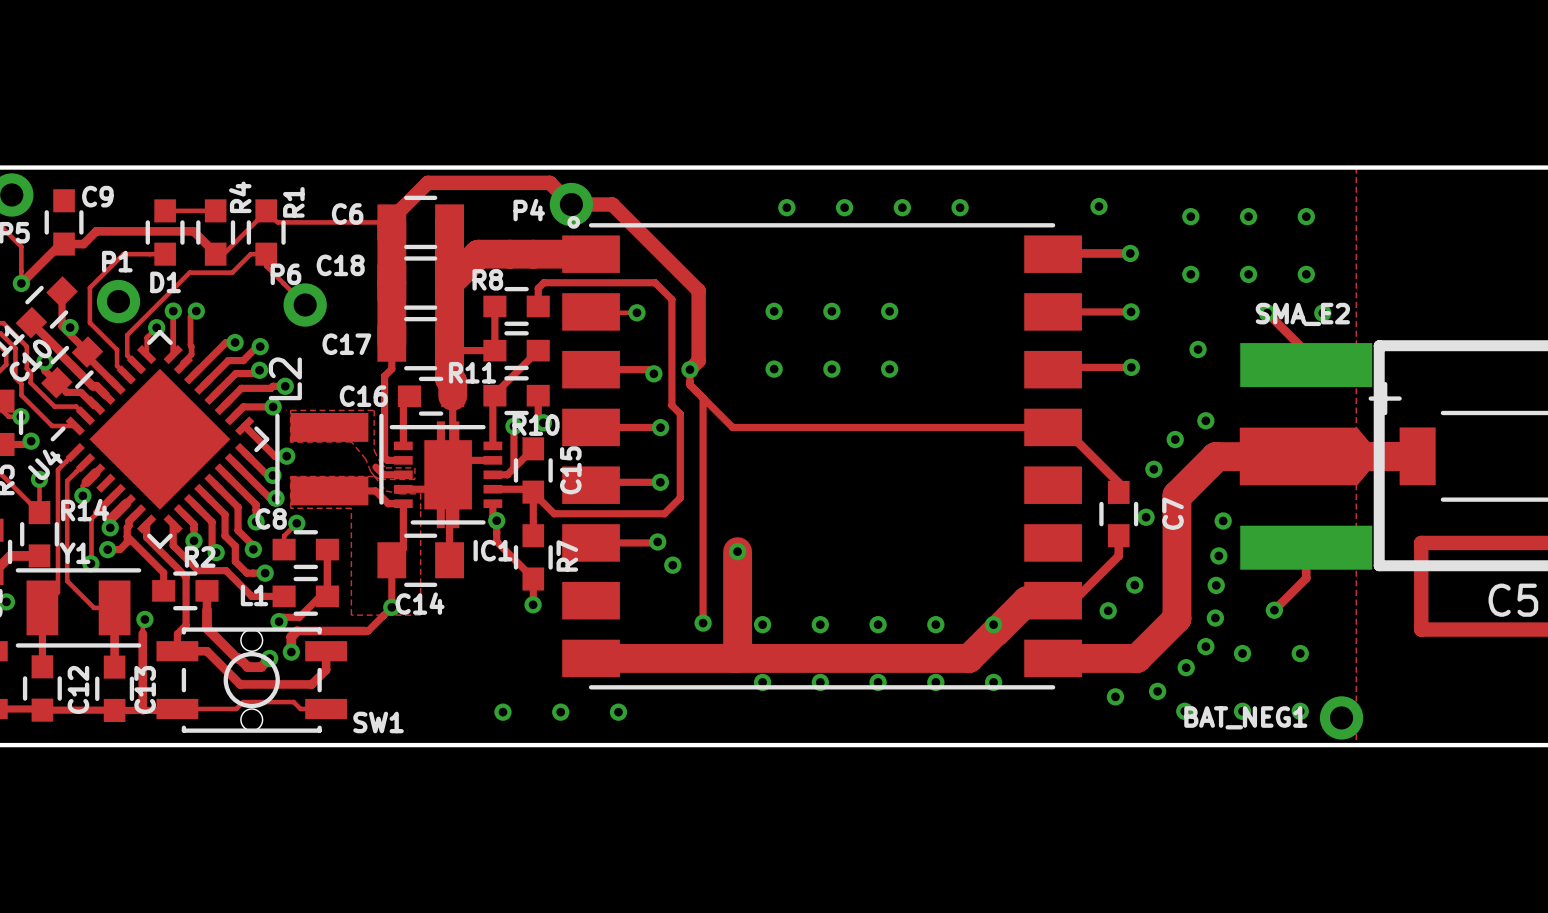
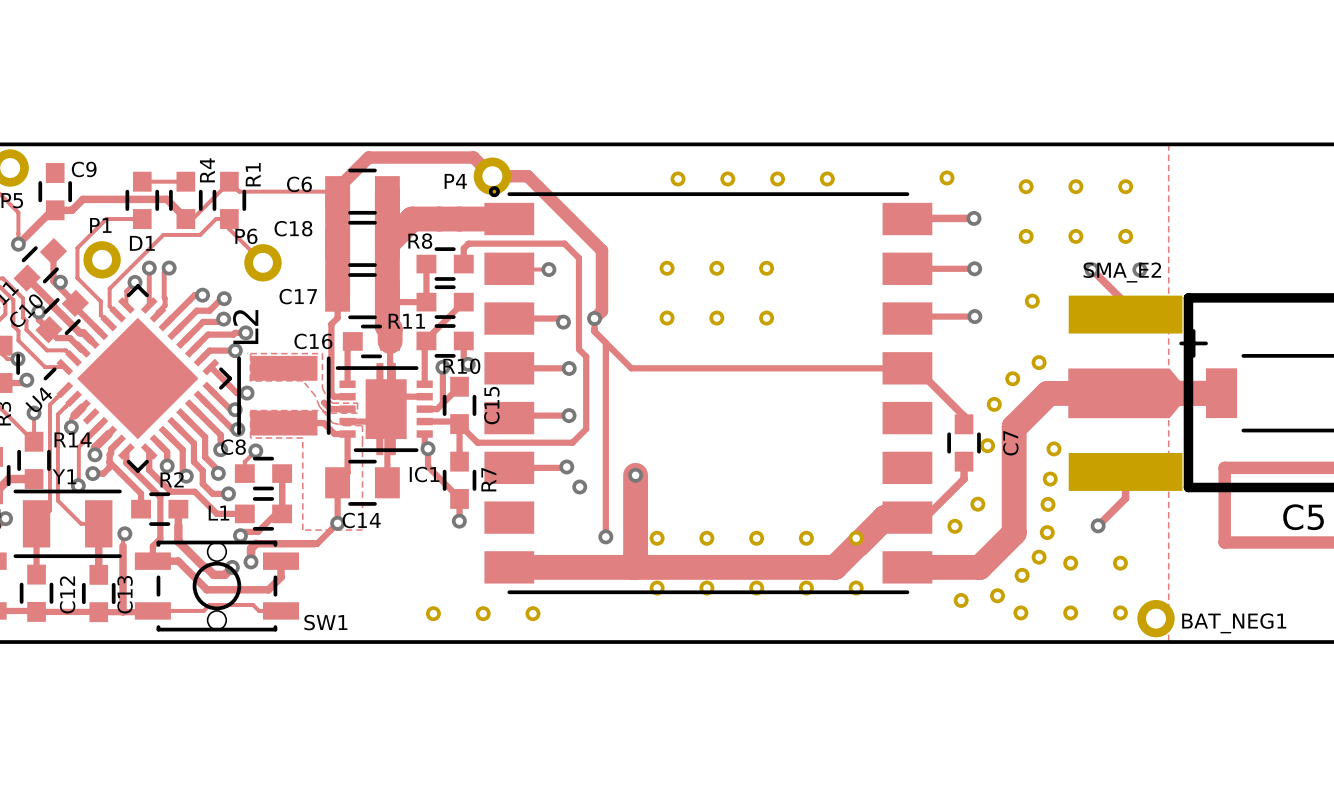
BAT_NEG1 name position: BAT_NEG1 (1245, 717) -> BAT_NEG1 (1234, 623)

